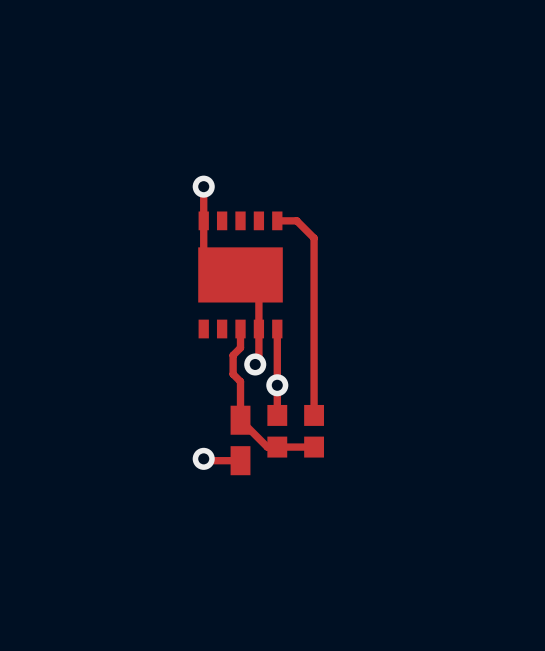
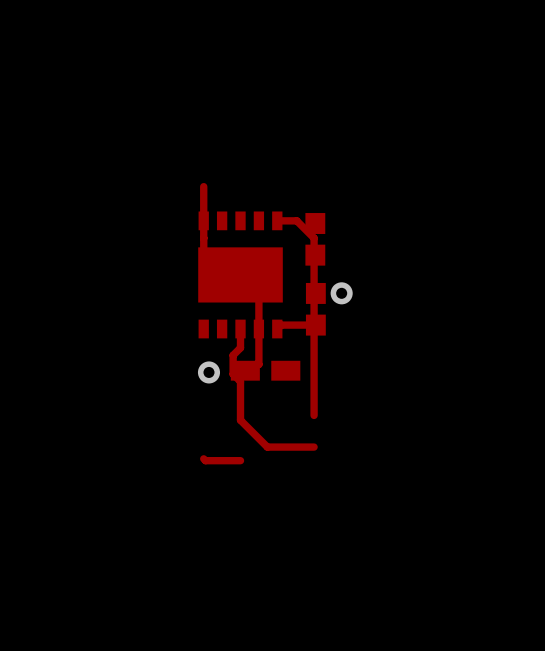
via: (203, 186) -> none
part: none -> (315, 239)
via: none -> (341, 293)
part: none -> (315, 309)
top track: (277, 329) (277, 415) -> (277, 329) (281, 325) (315, 325)
via: (255, 364) -> none
via: none -> (208, 372)
via: (277, 385) -> none
part: (277, 431) -> none
part: (314, 431) -> none
part rotation: 0° (240, 440) -> 90° clockwise (265, 370)
part position: (240, 440) -> (265, 370)
via: (203, 458) -> none

